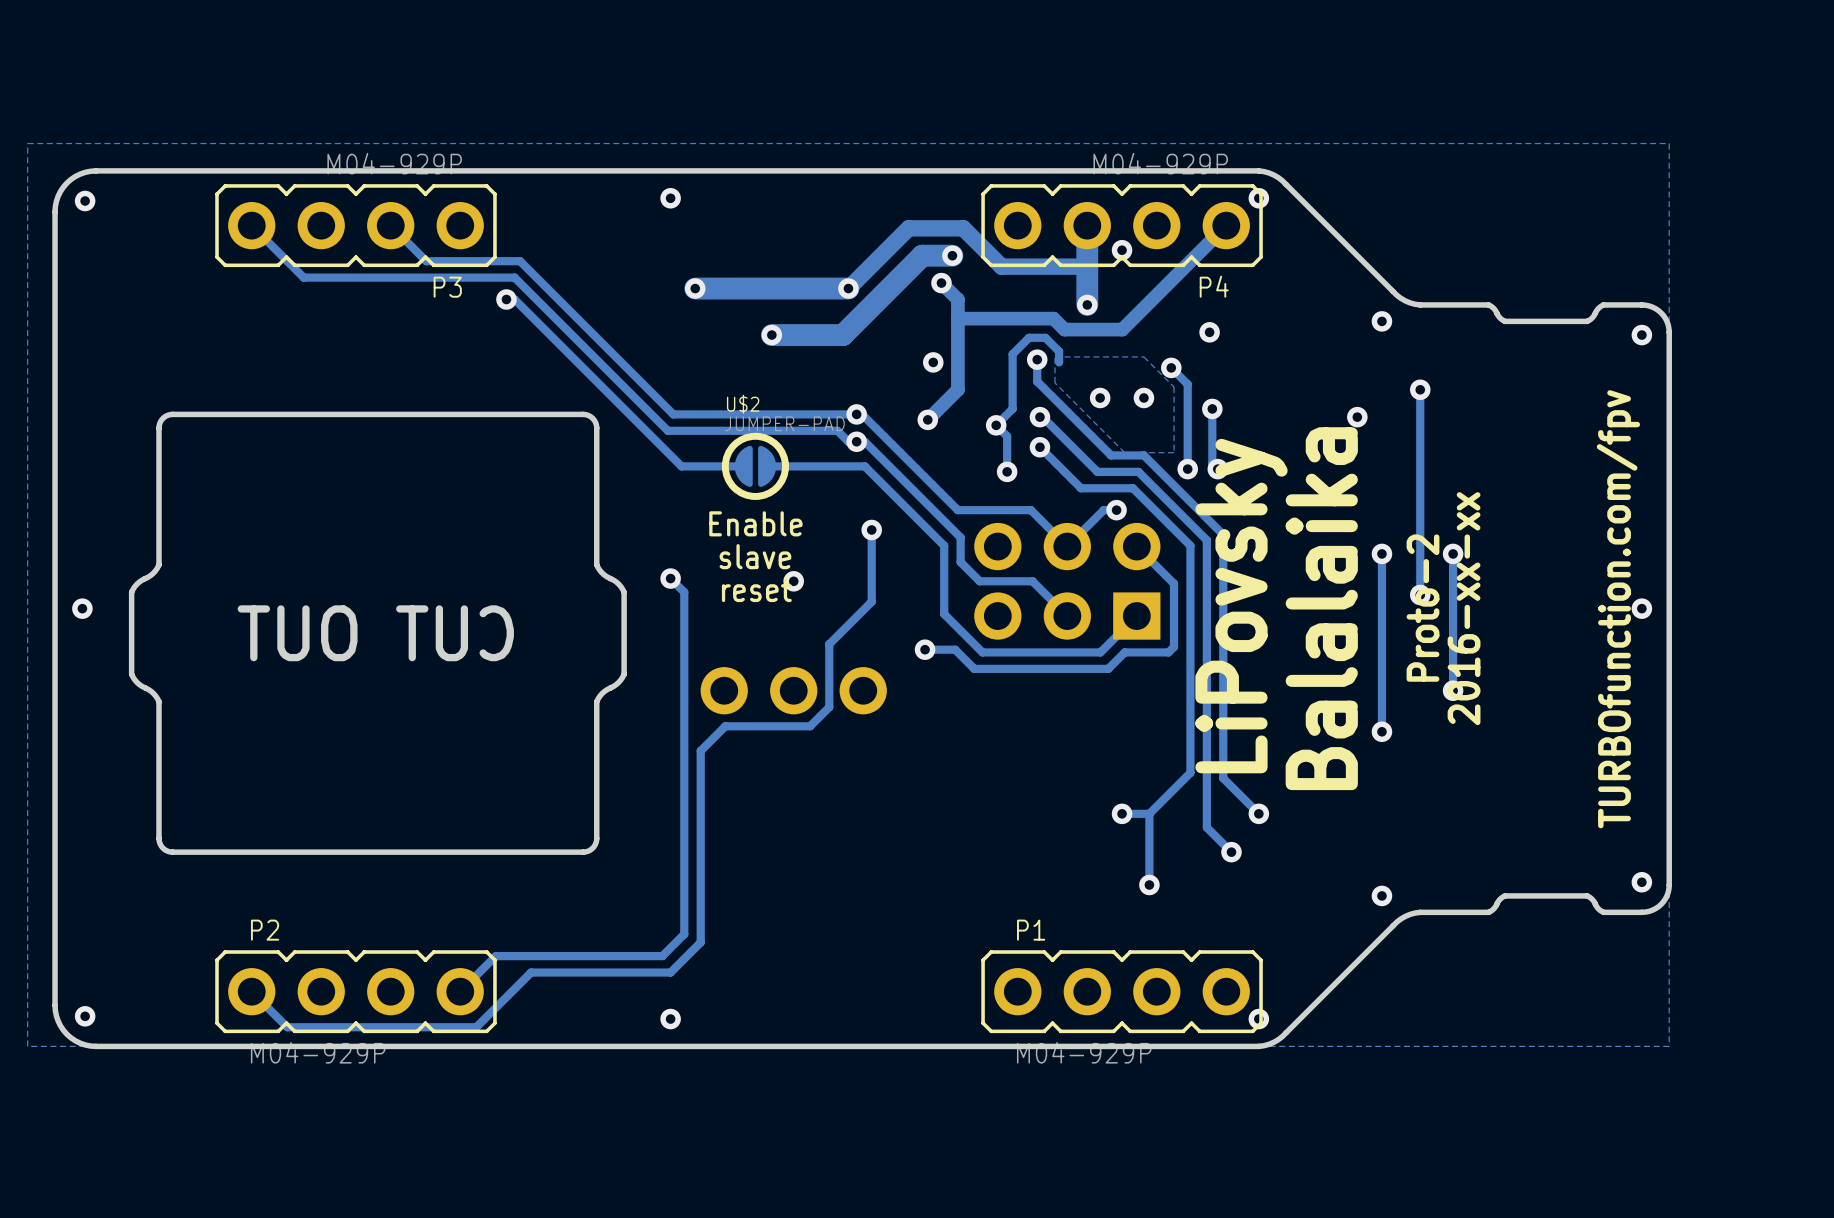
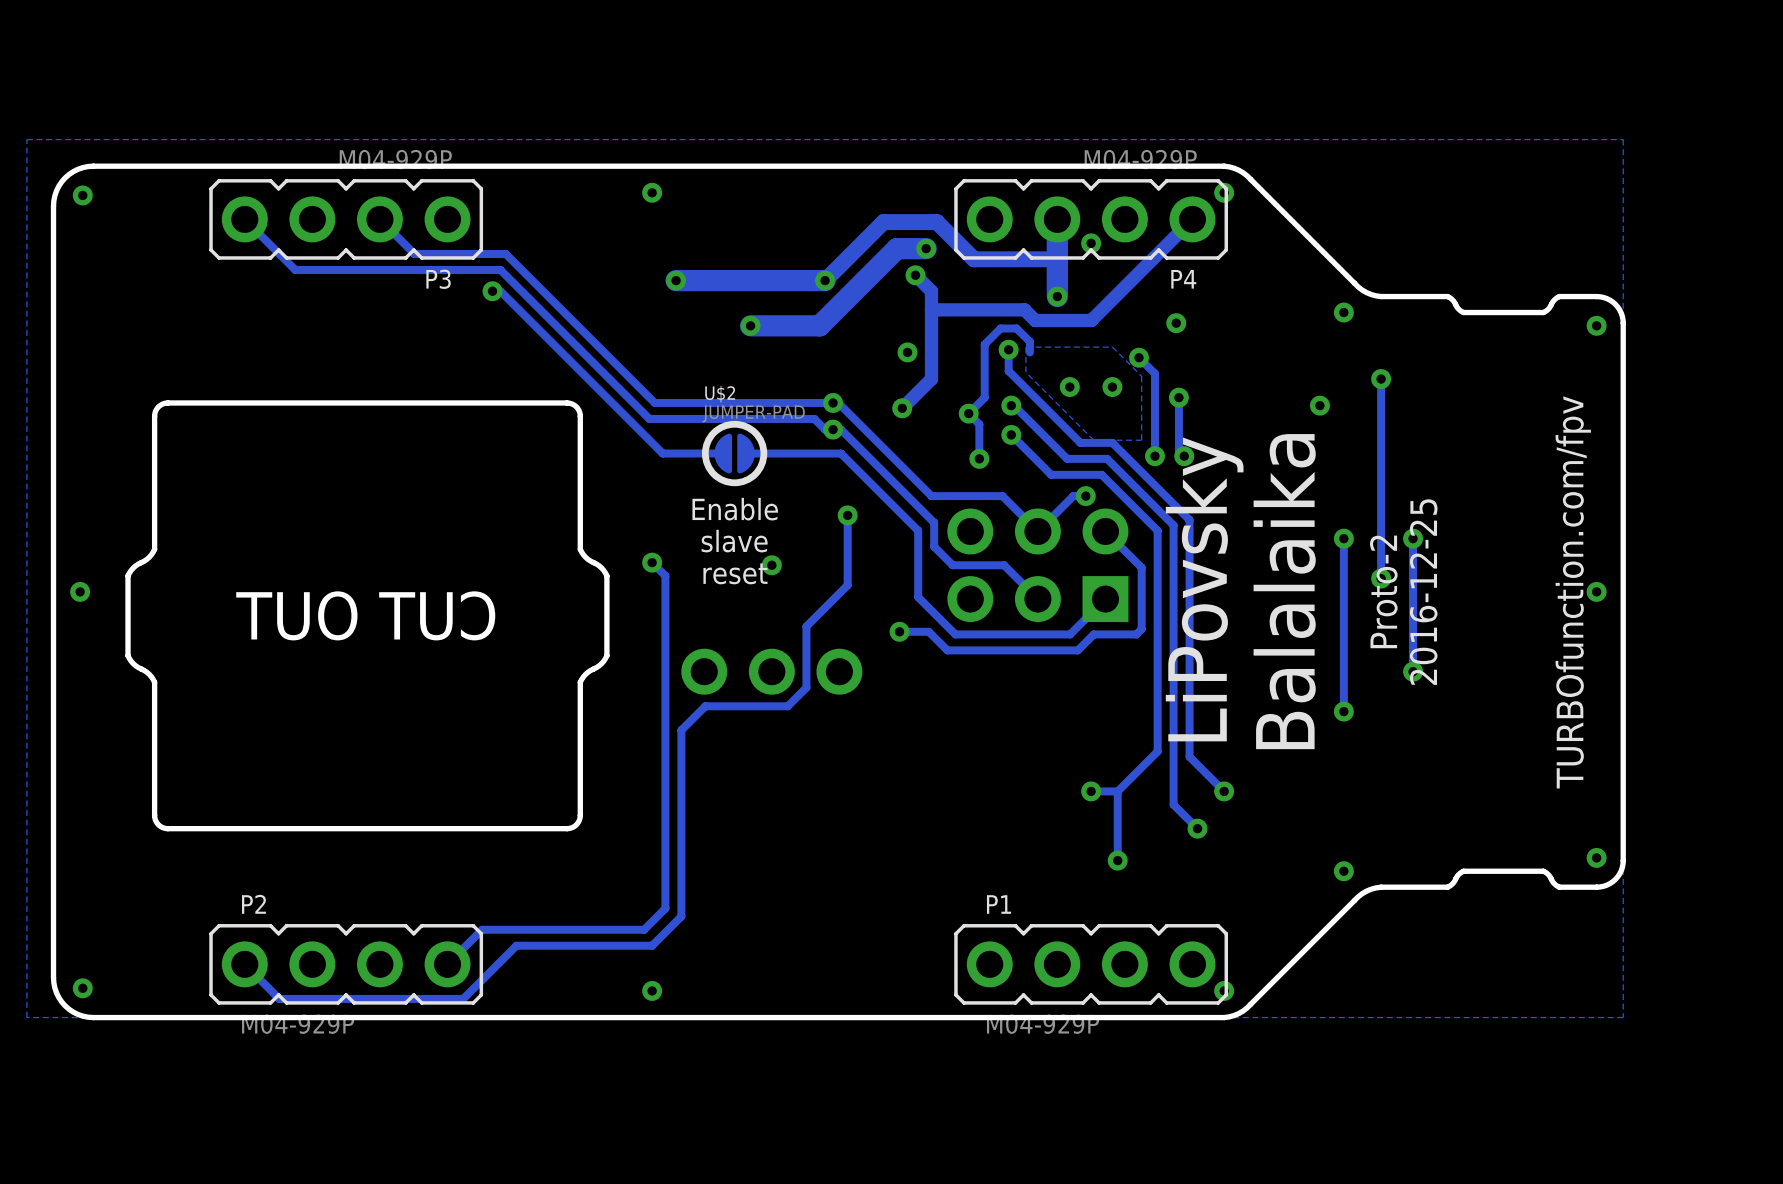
text: 2016-xx-xx (1464, 608) -> 2016-12-25 (1423, 592)

